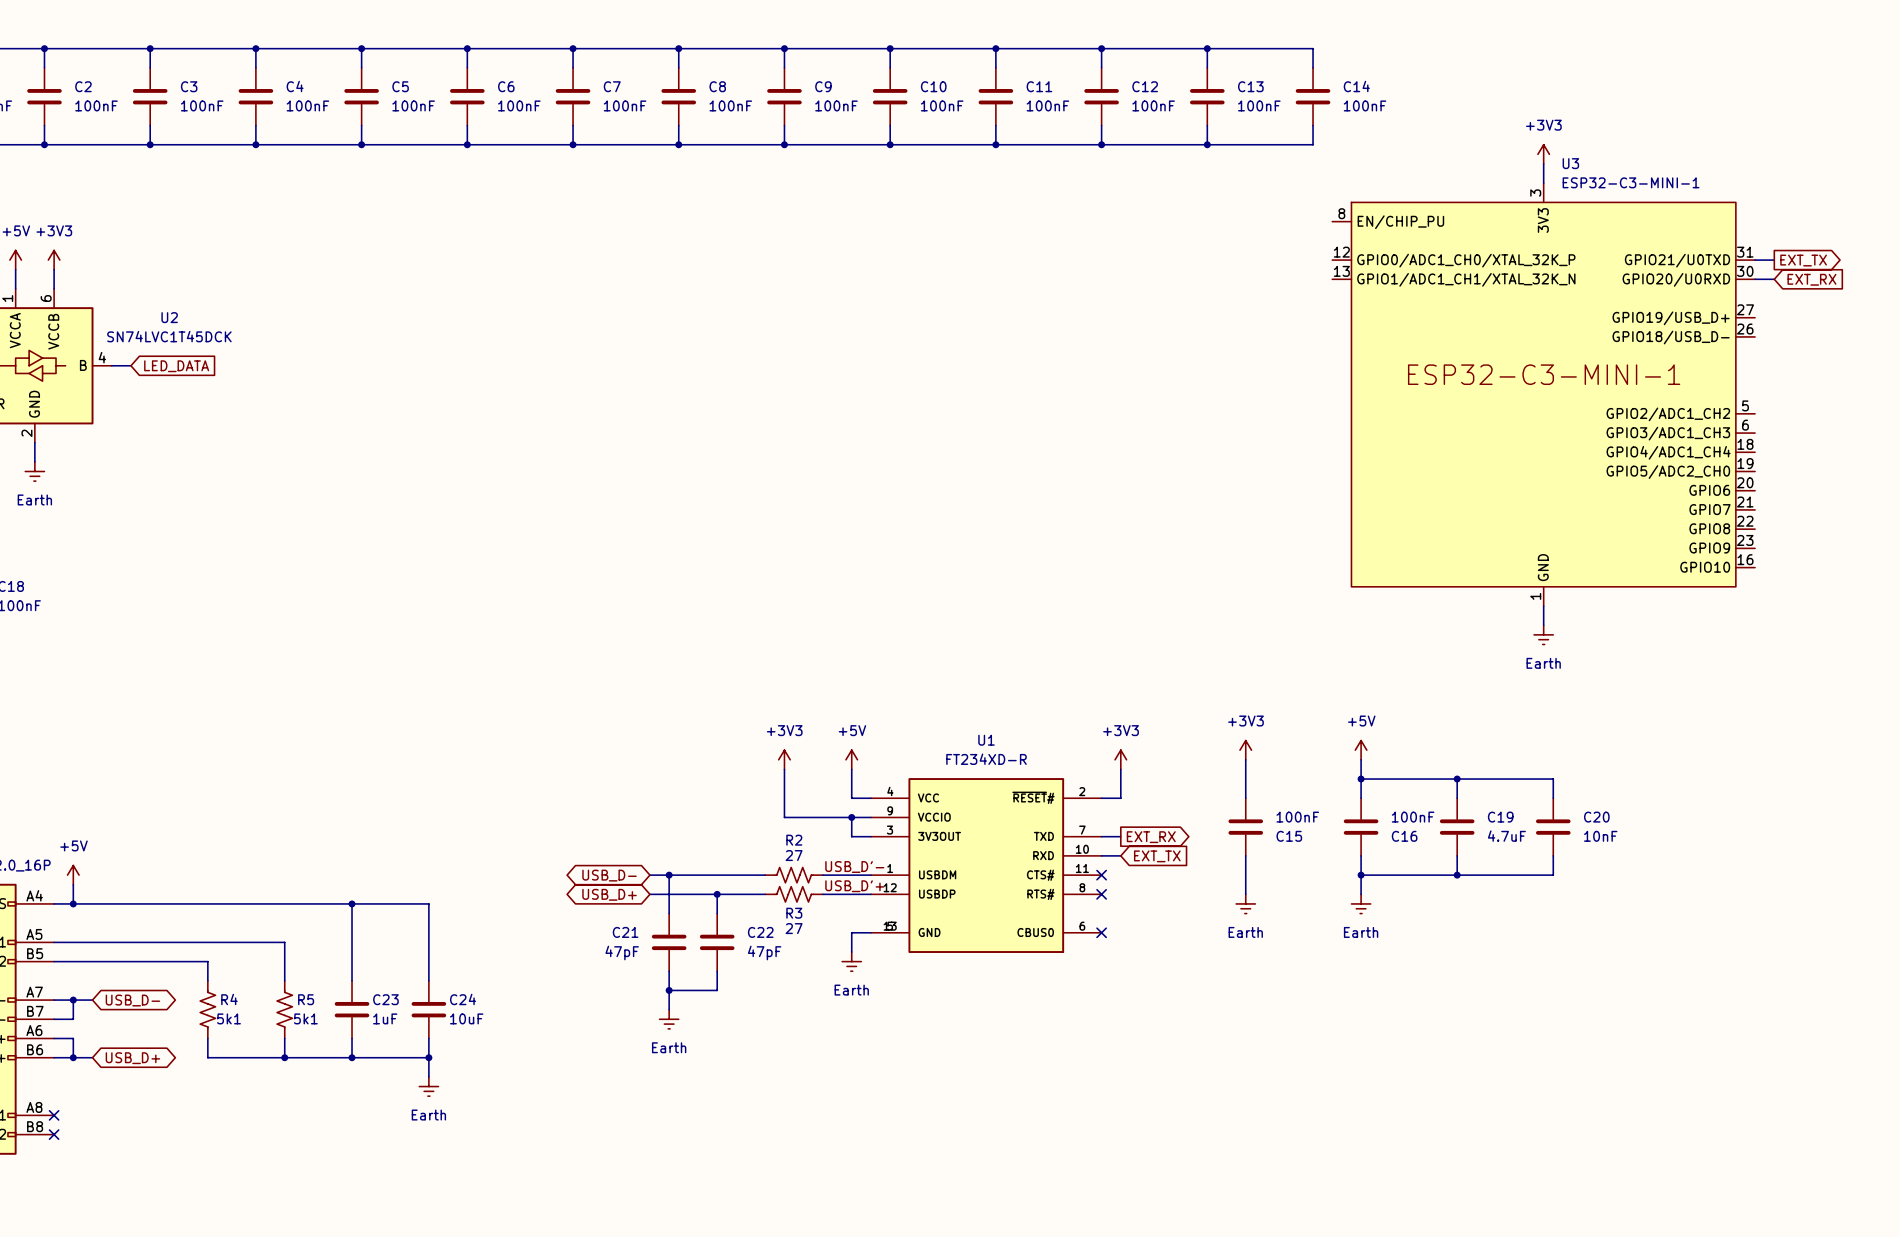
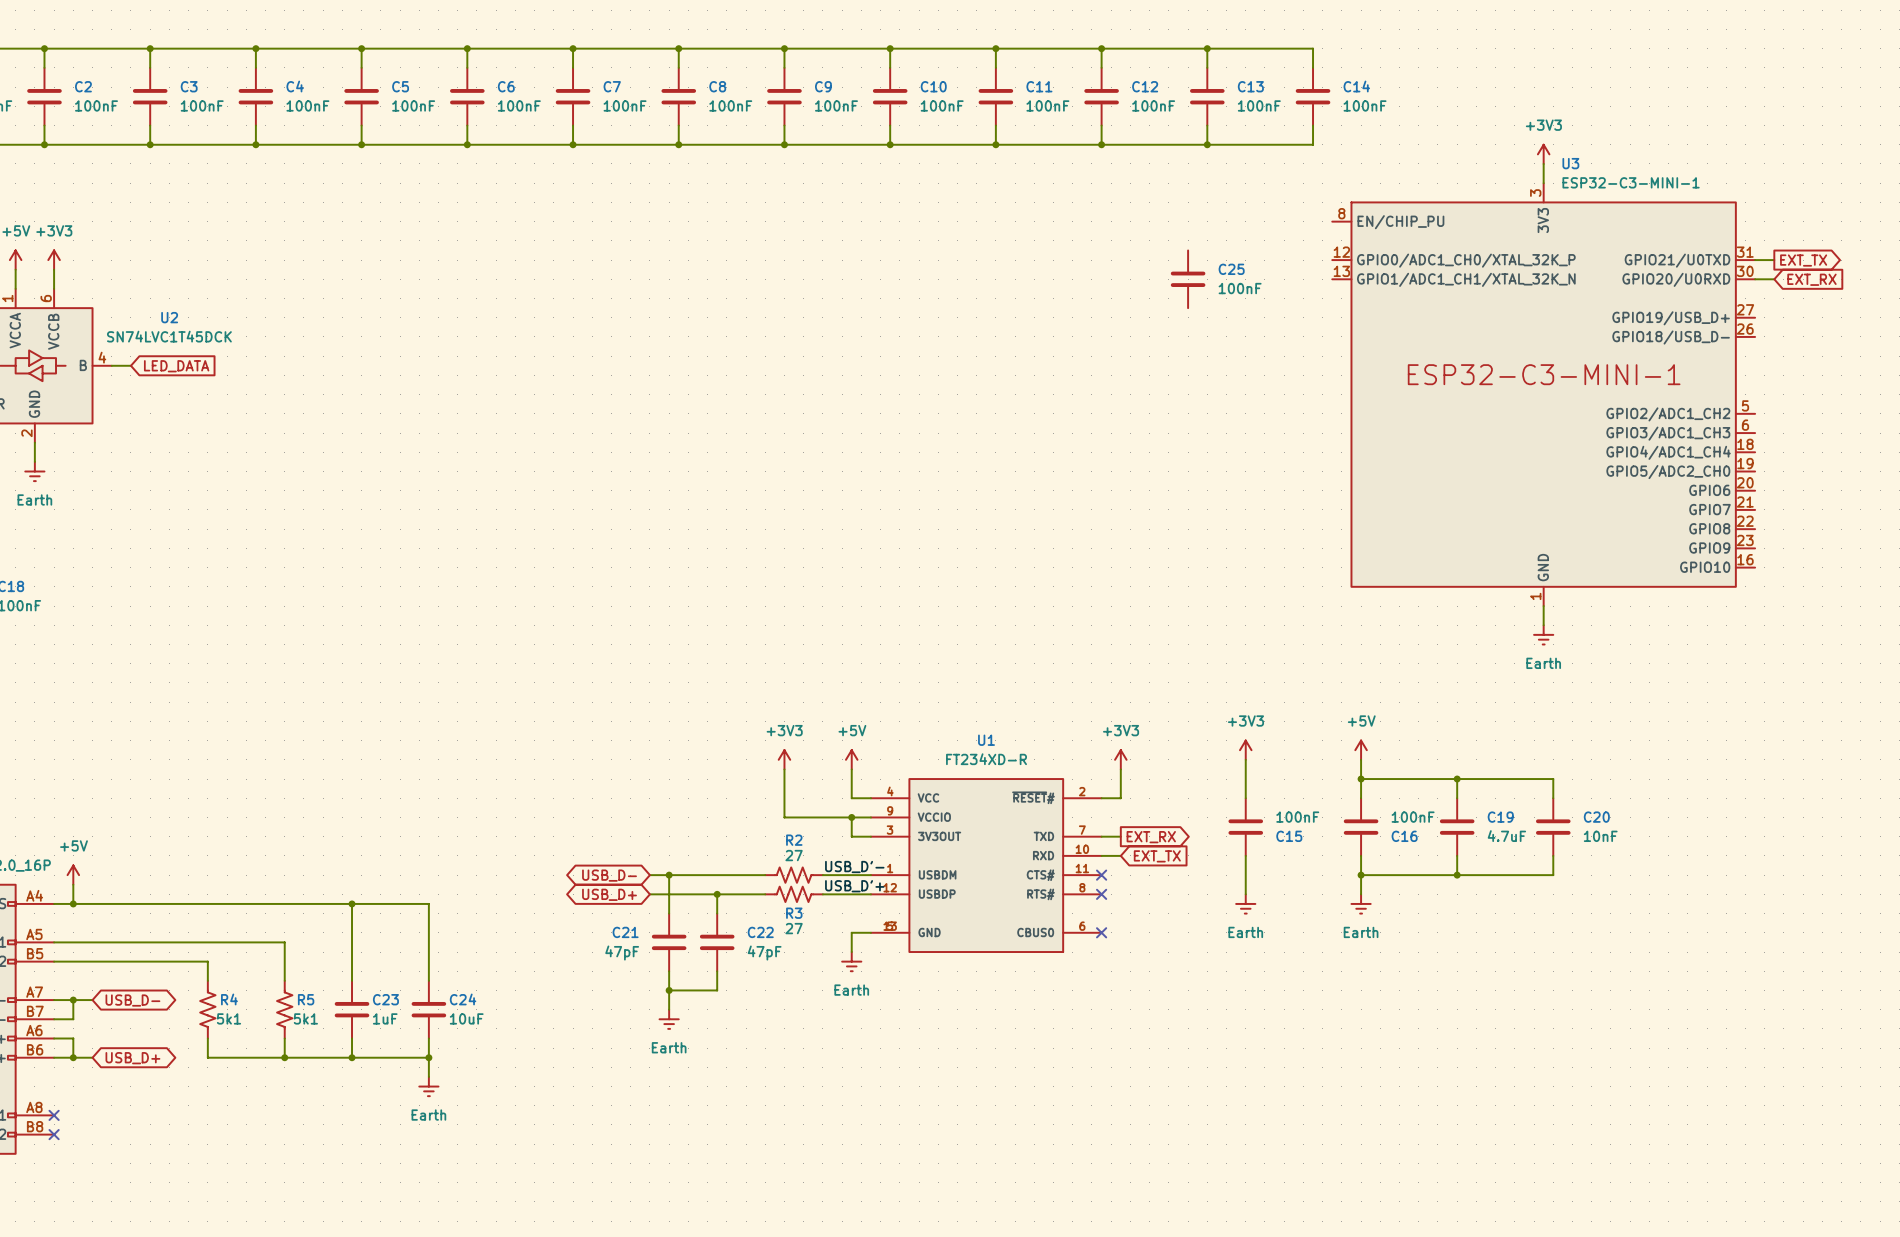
C25: none -> 100nF (1188, 279)

